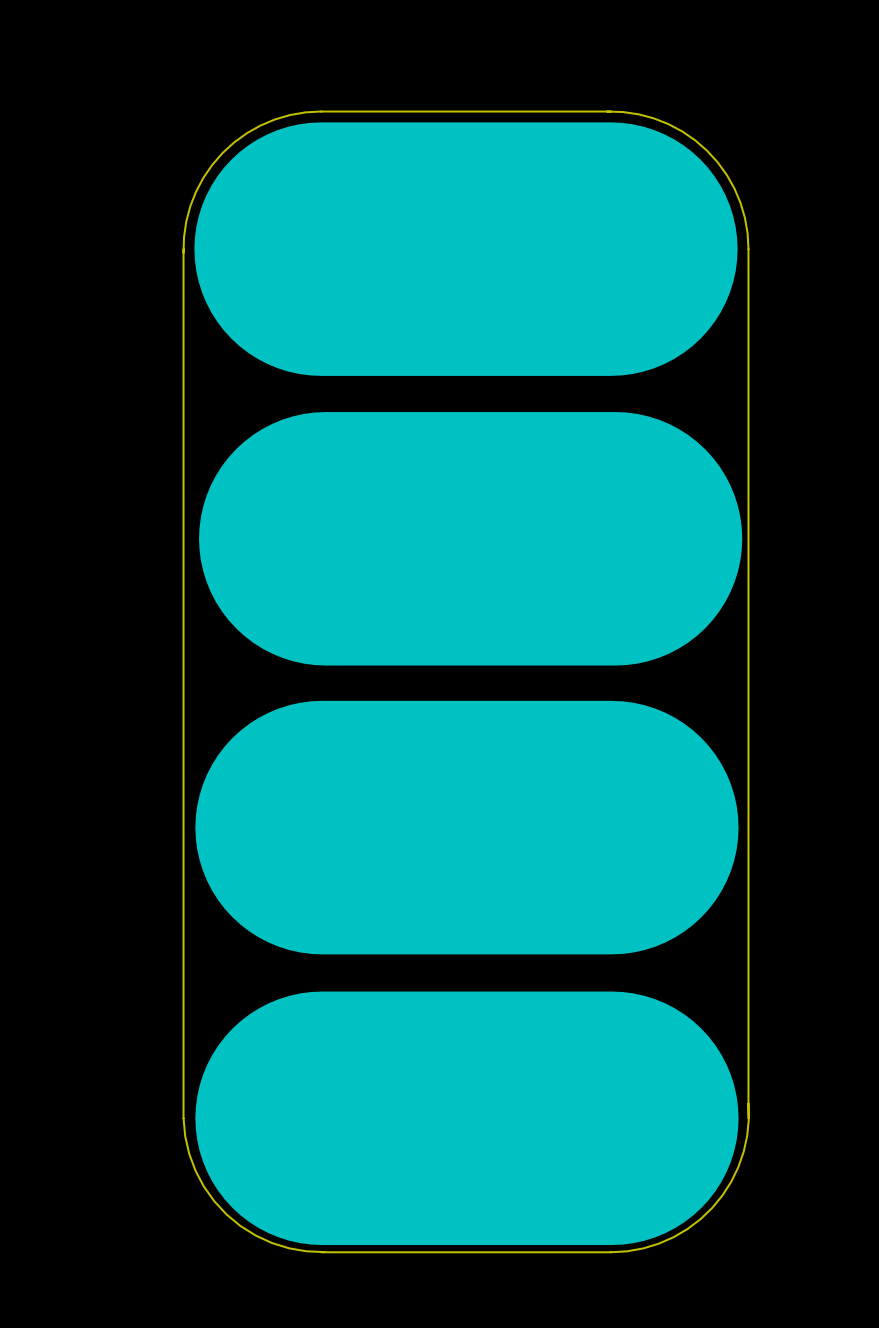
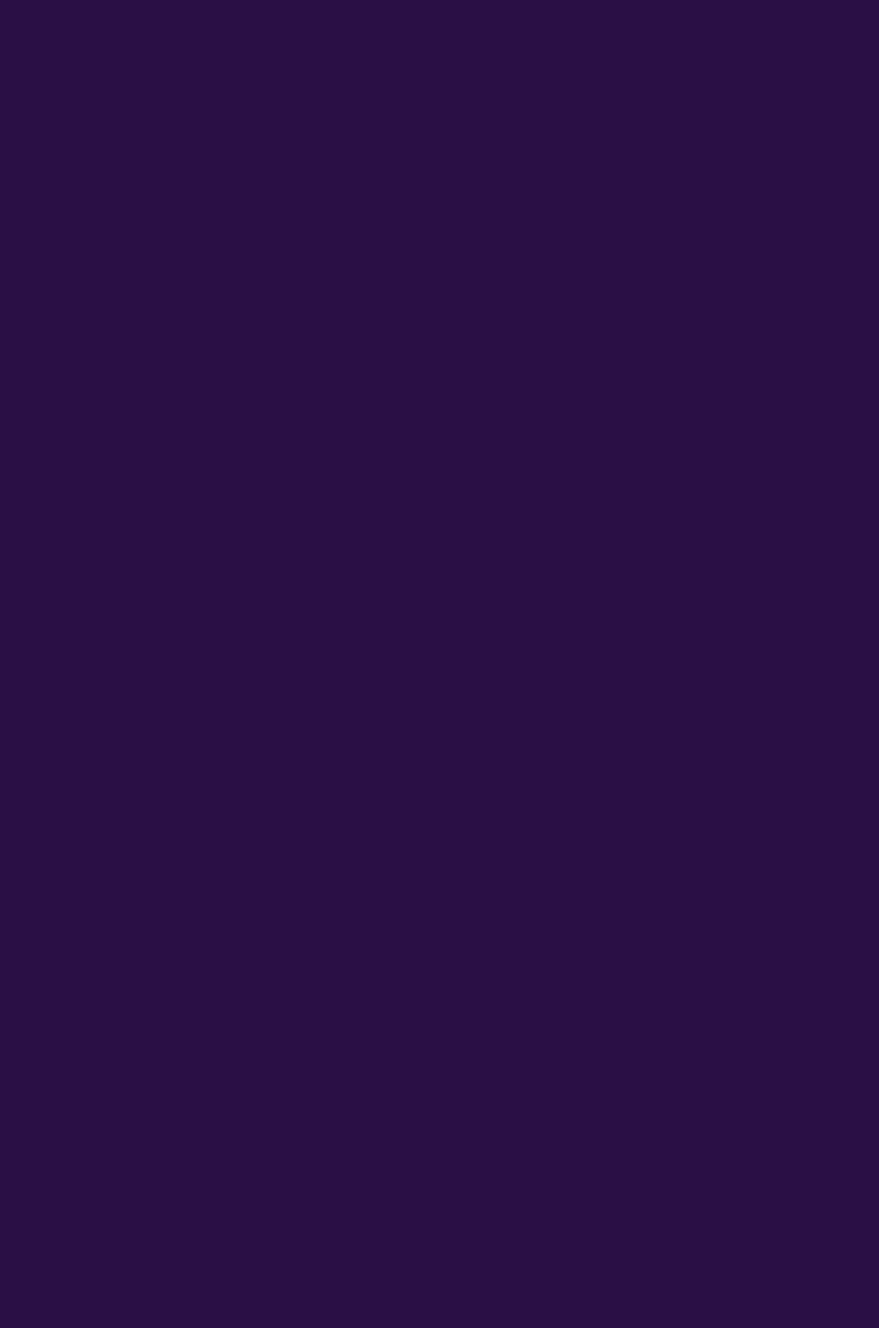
part: (466, 681) -> none

